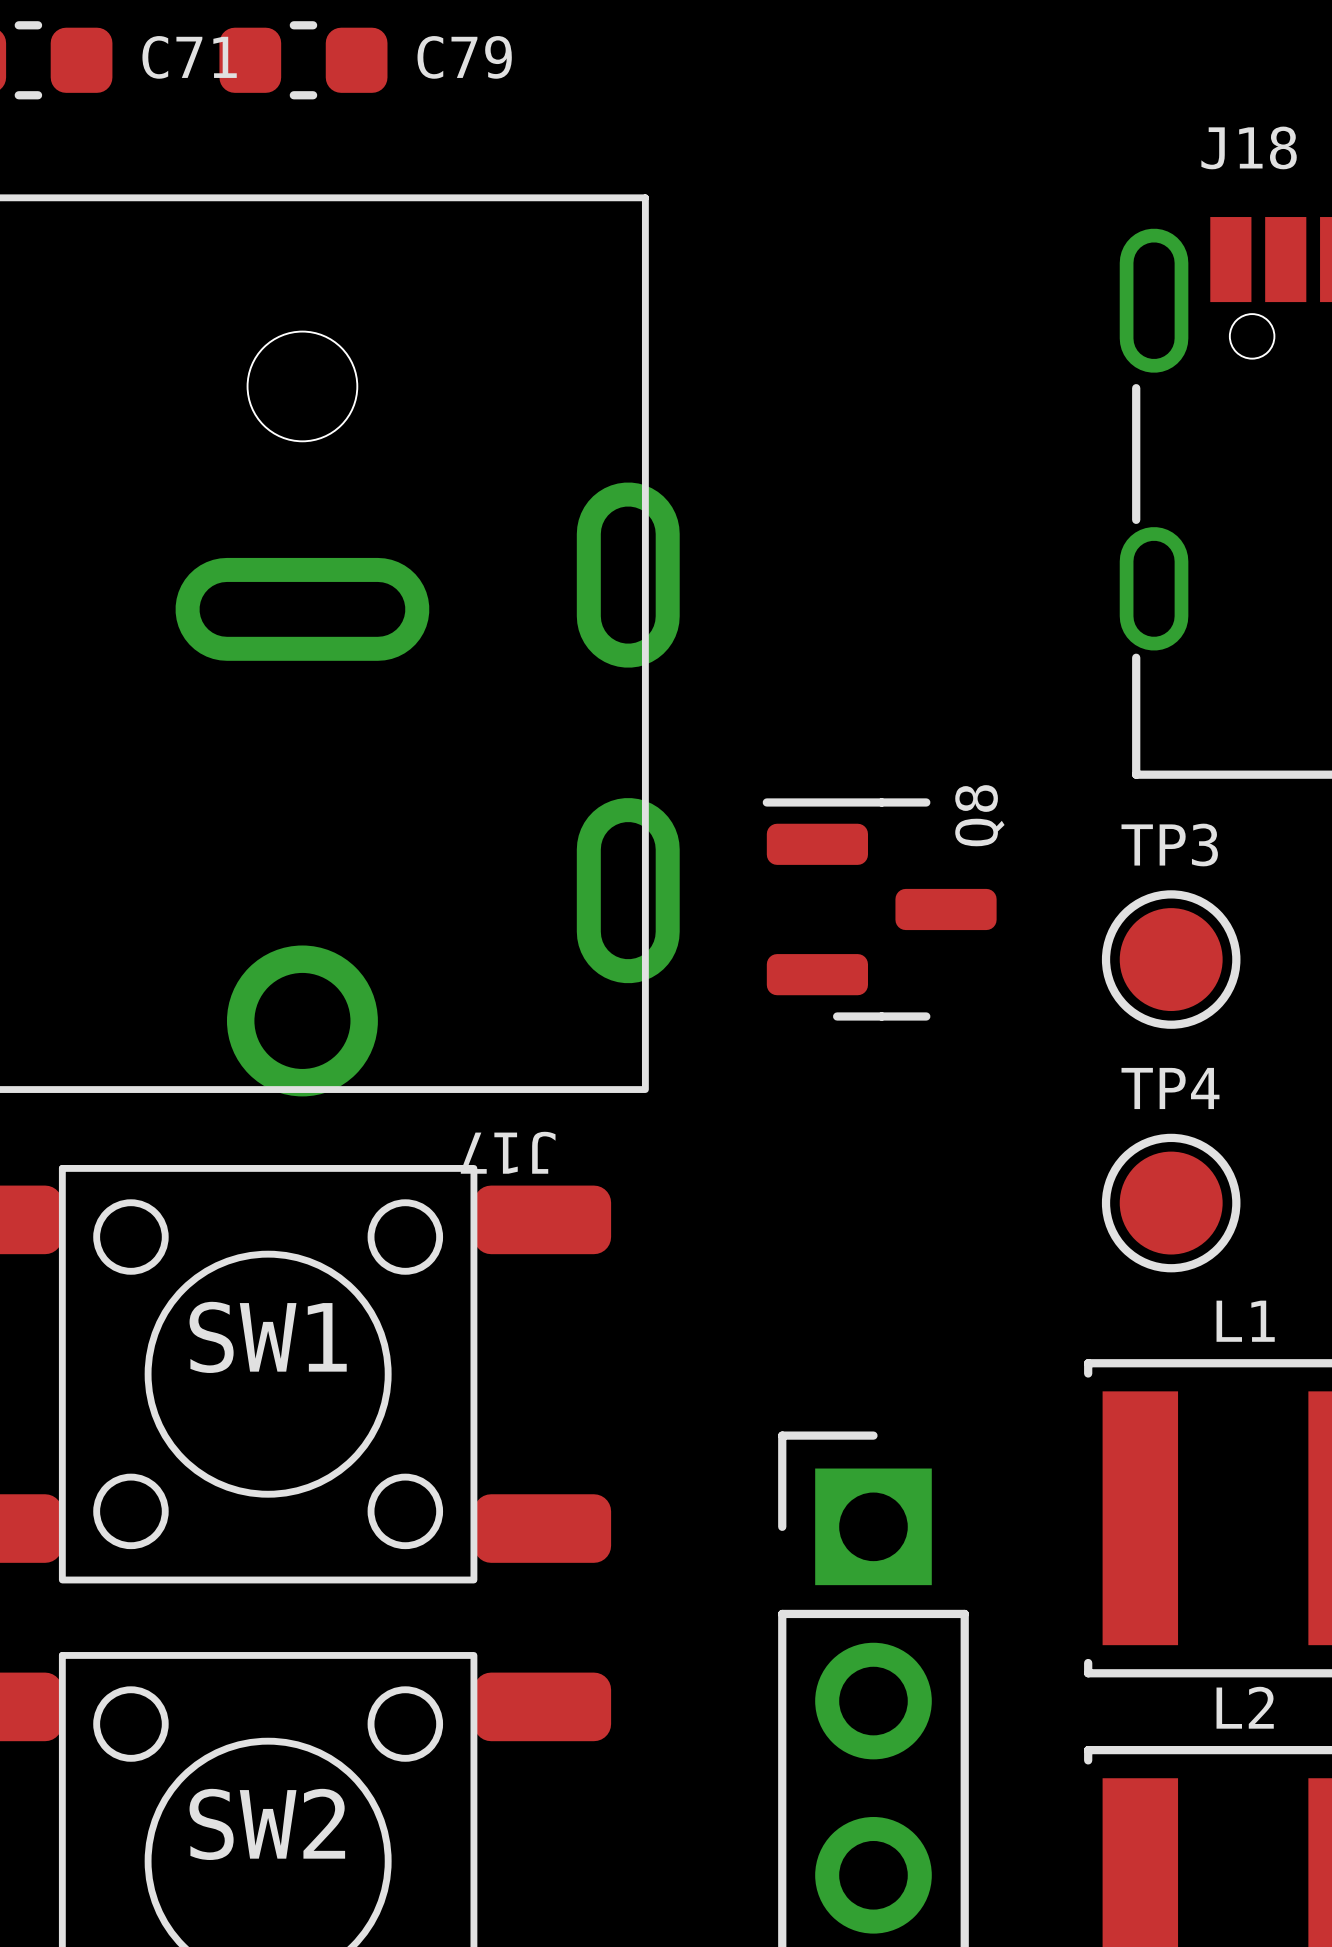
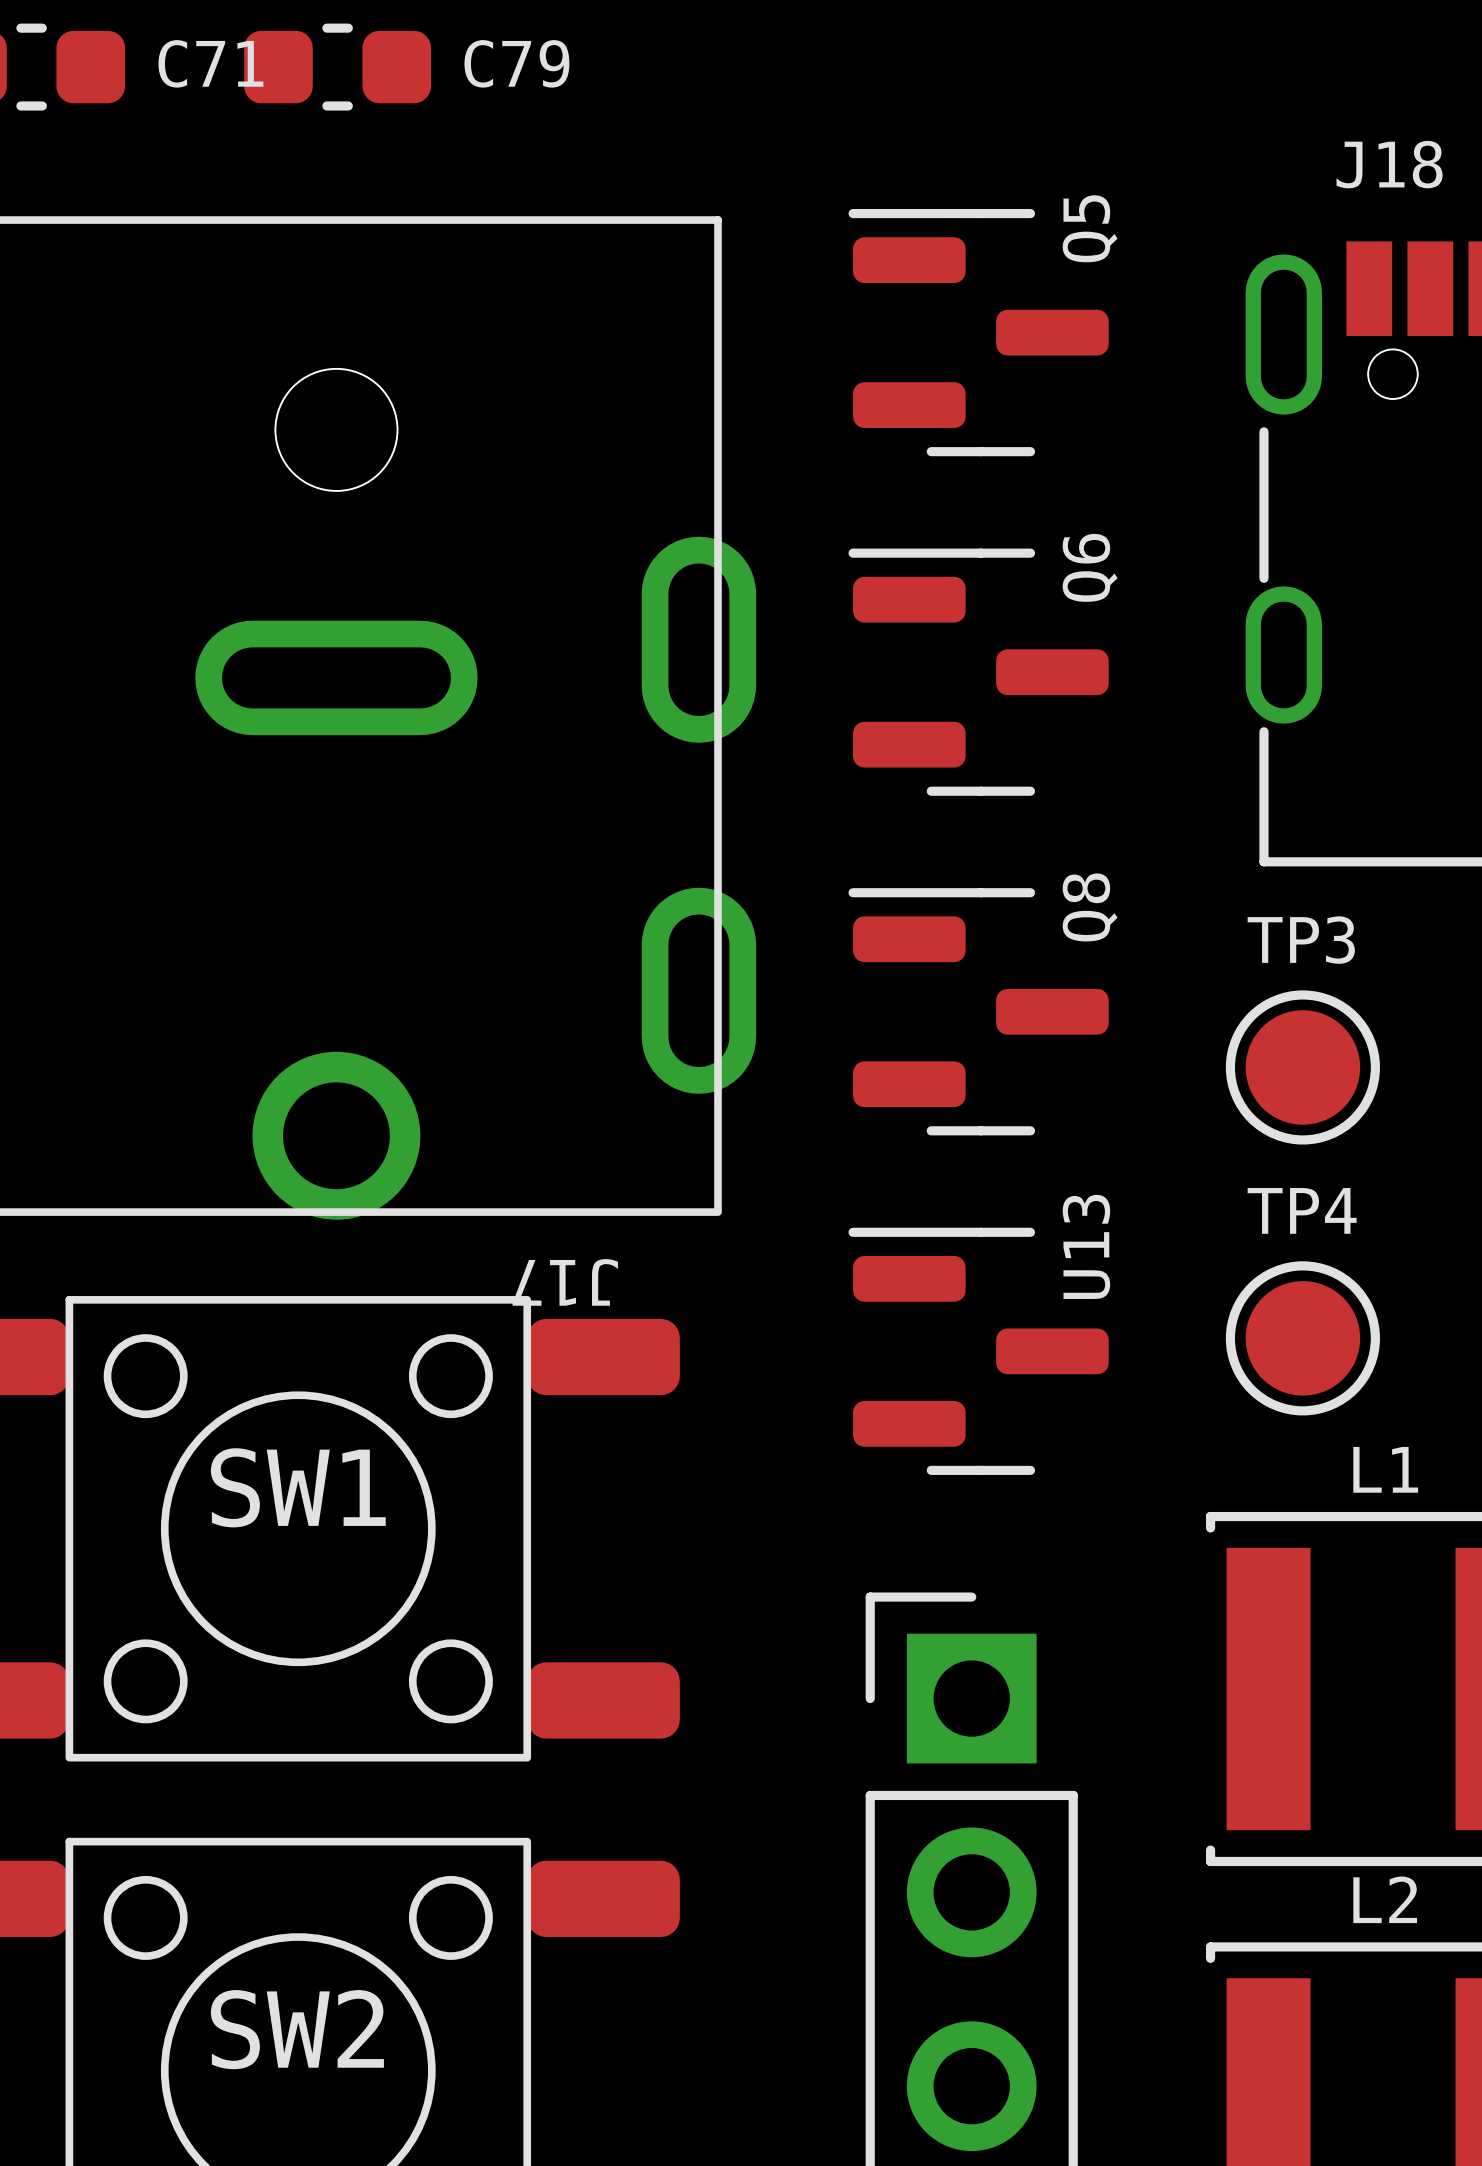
Q5: none -> (978, 332)
Q6: none -> (978, 672)
U13: none -> (978, 1351)

